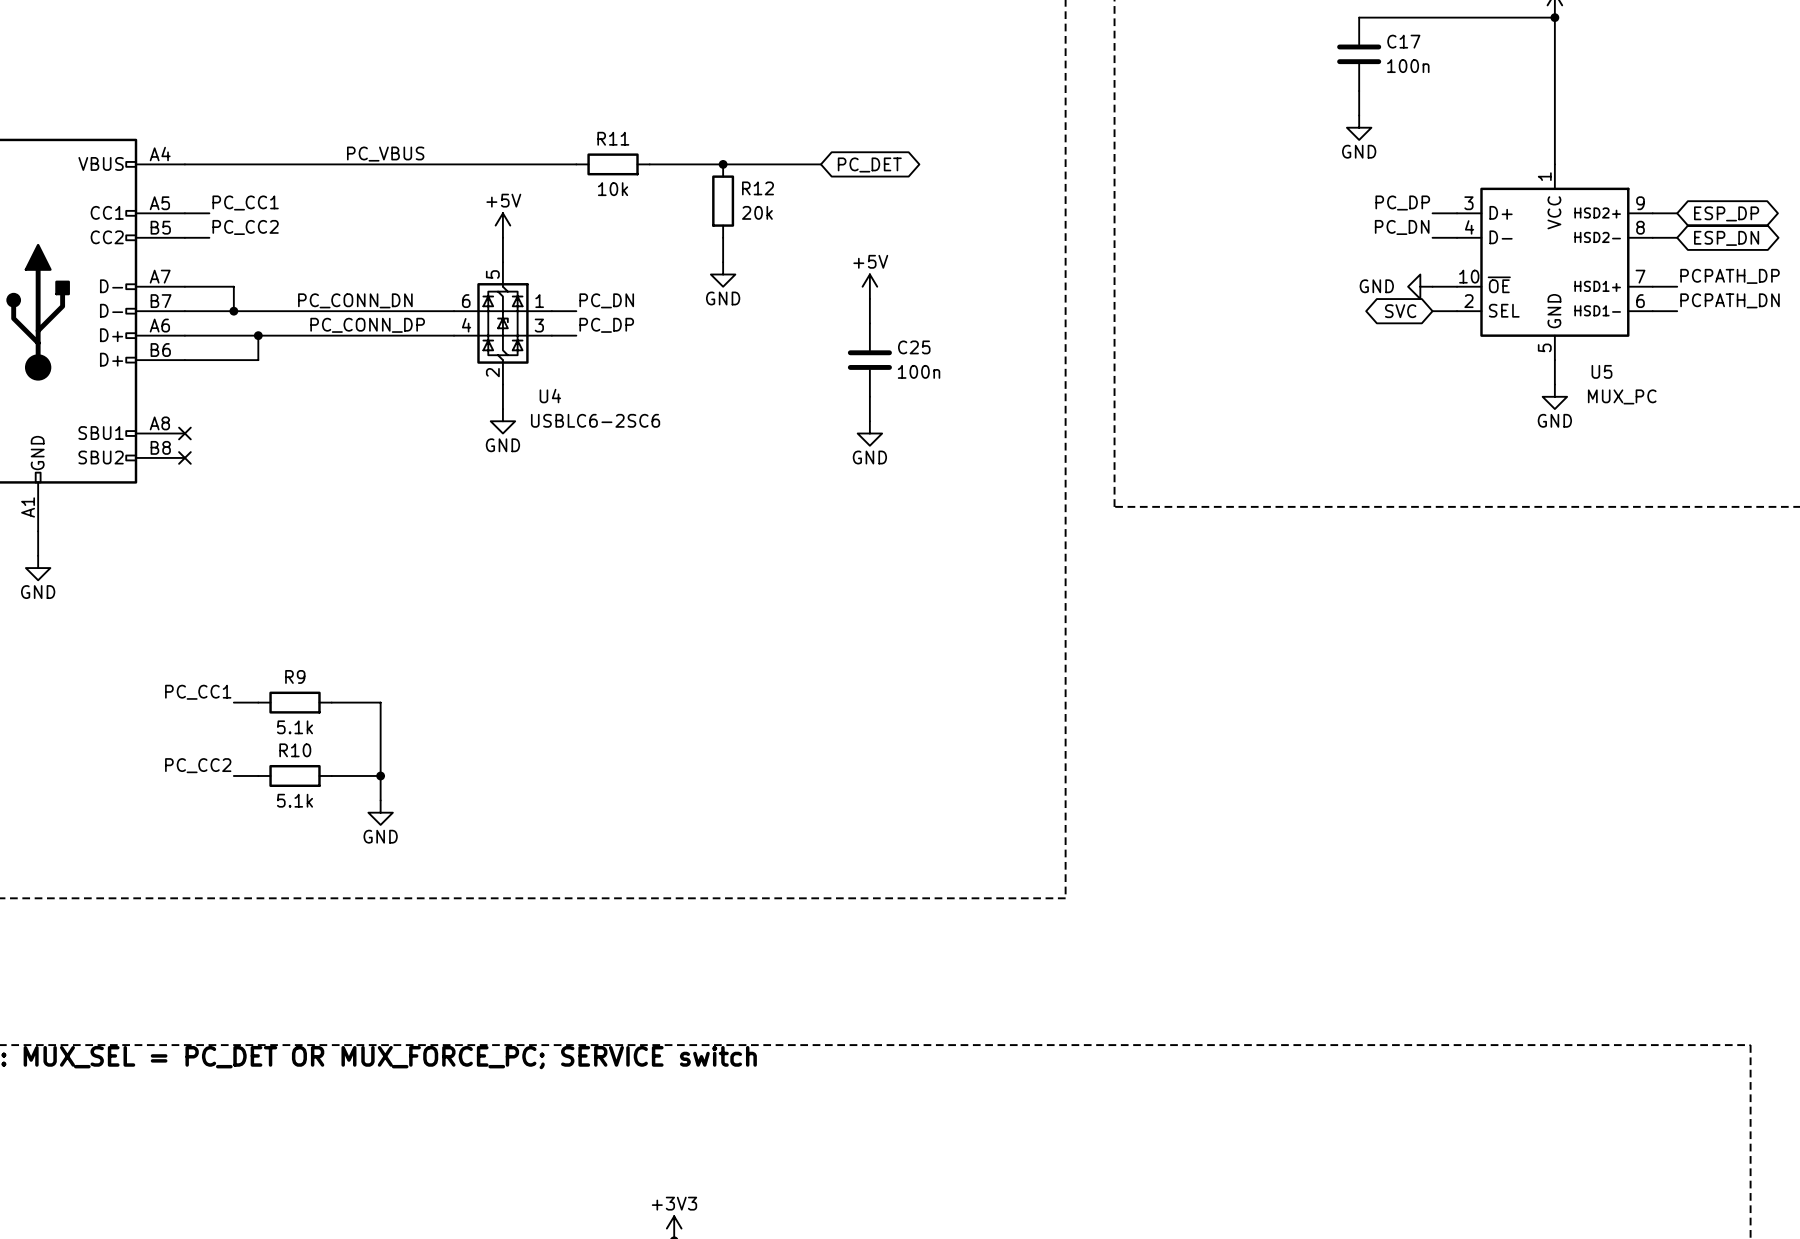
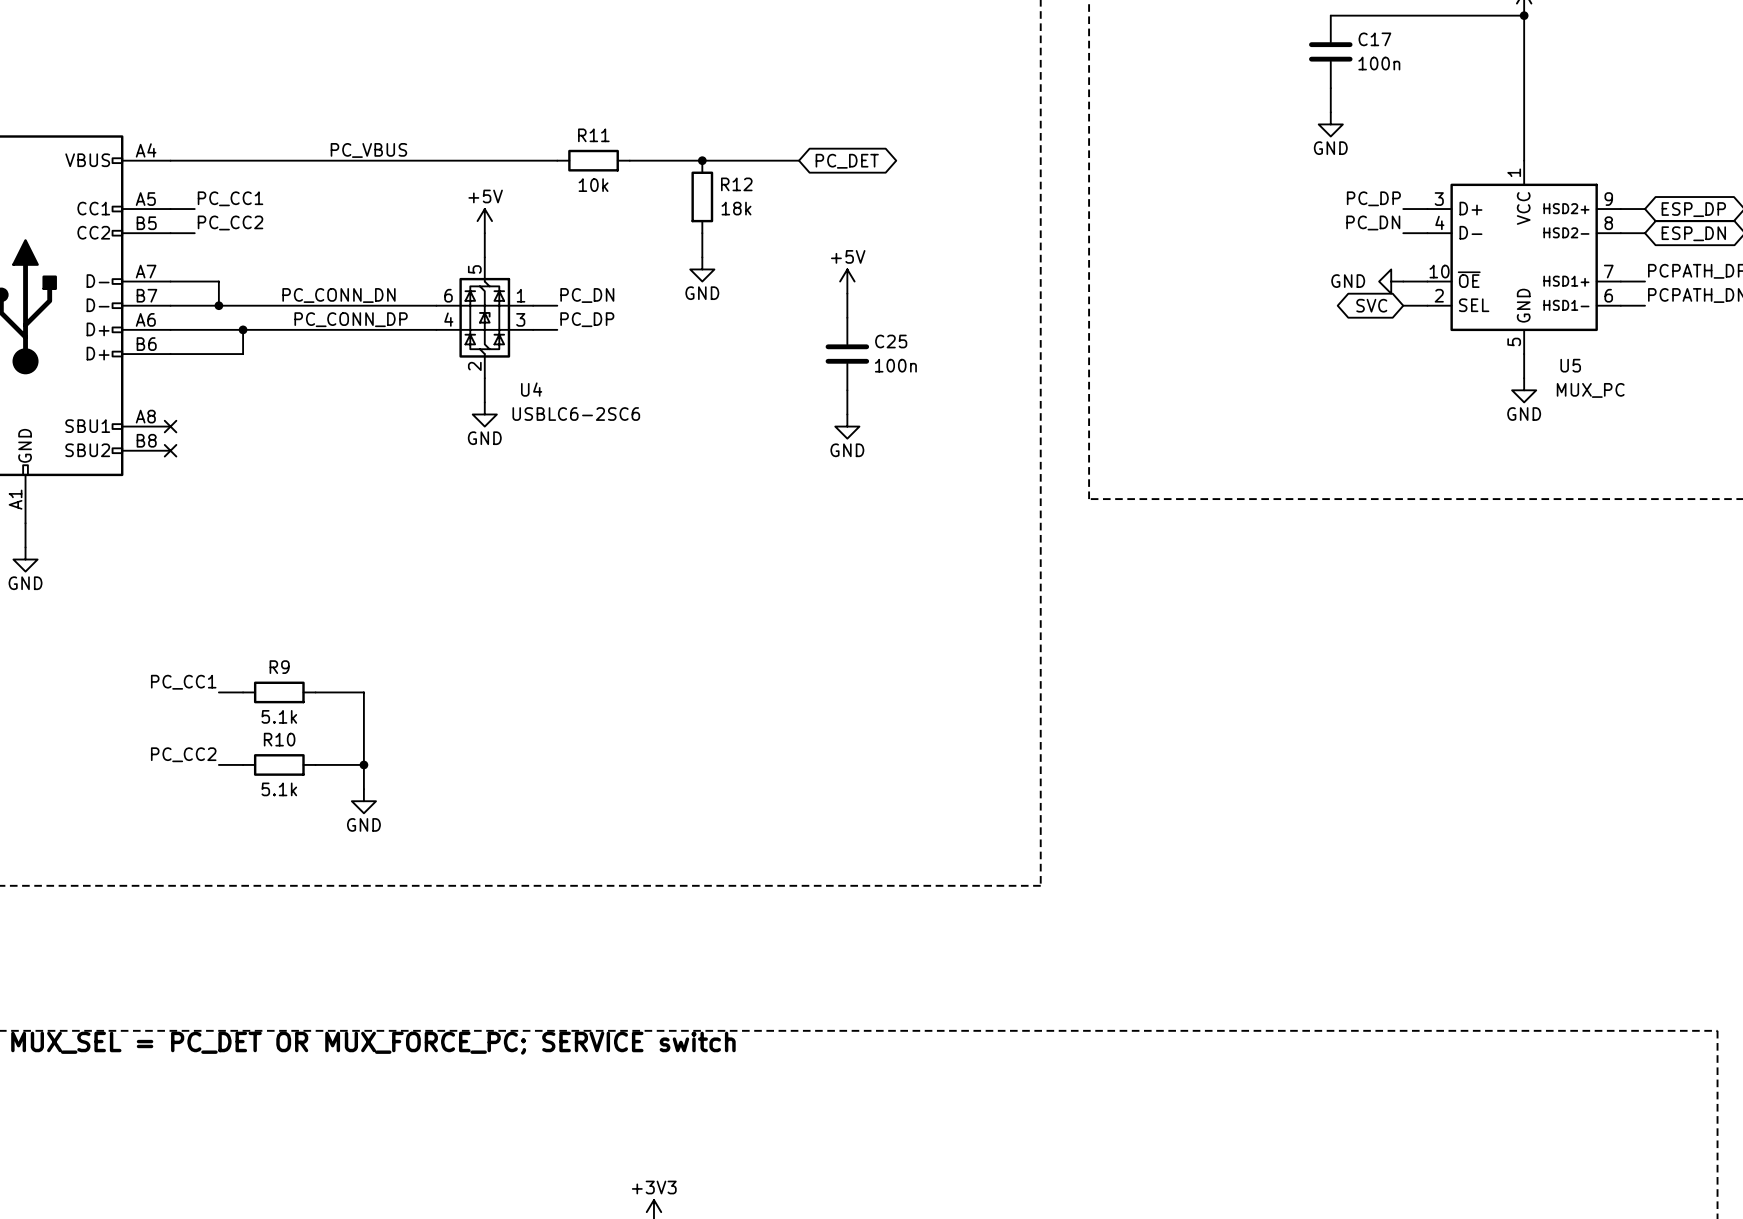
R12 value: 20k (757, 212) -> 18k (736, 208)

